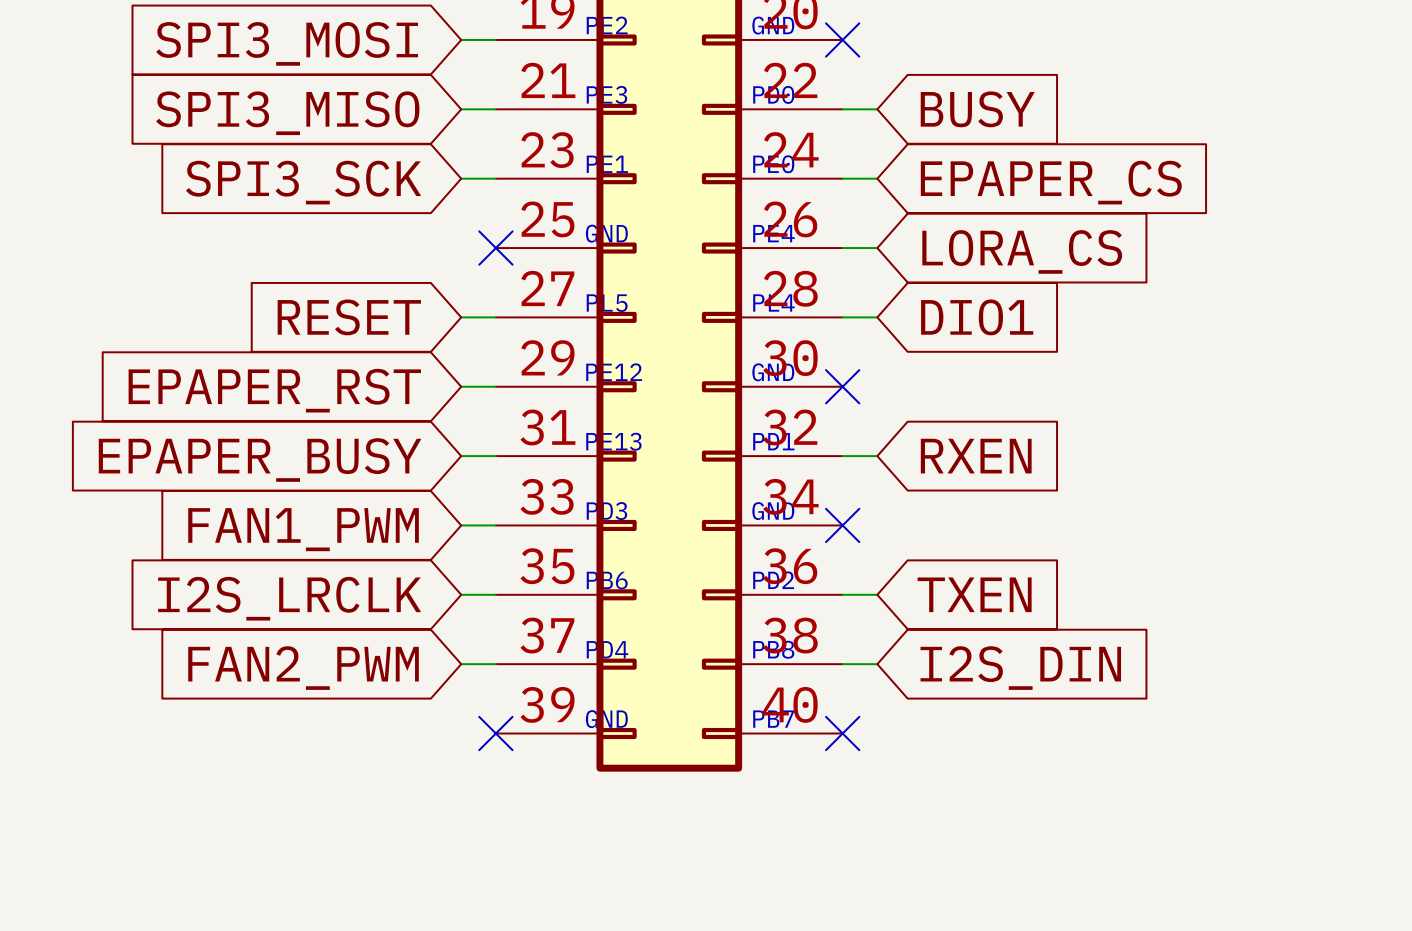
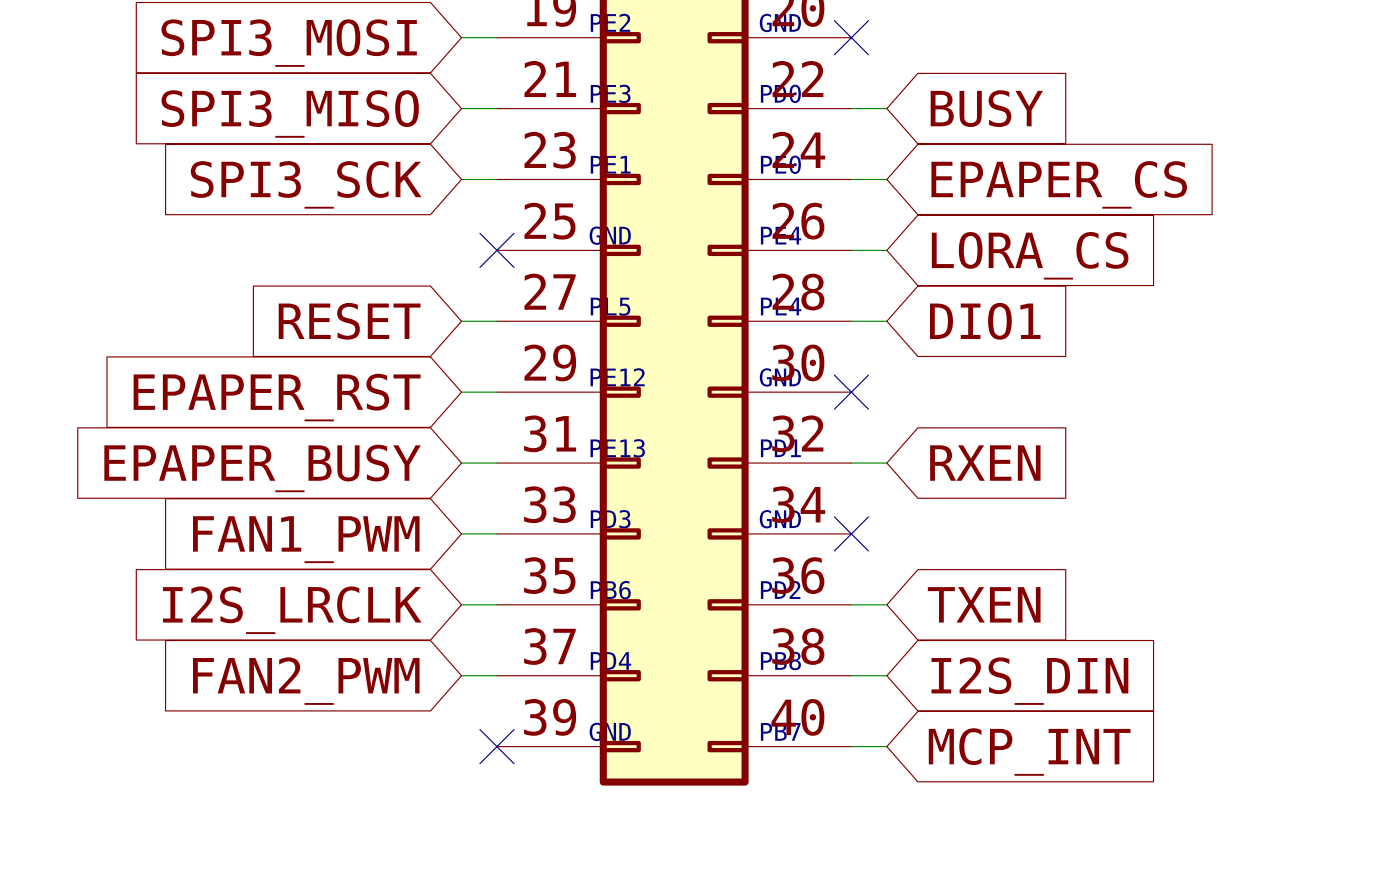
wire: none -> (851, 746) (886, 746)
no-connect mark: (842, 733) -> none
global label: none -> MCP_INT (1029, 752)

